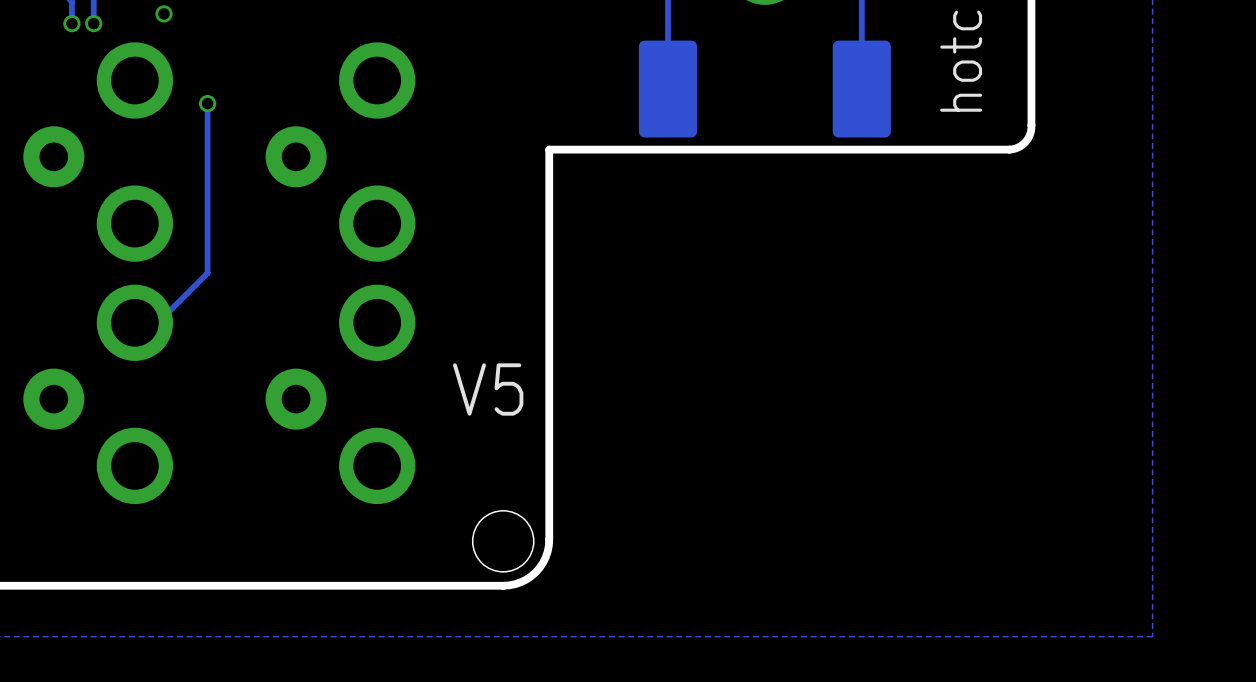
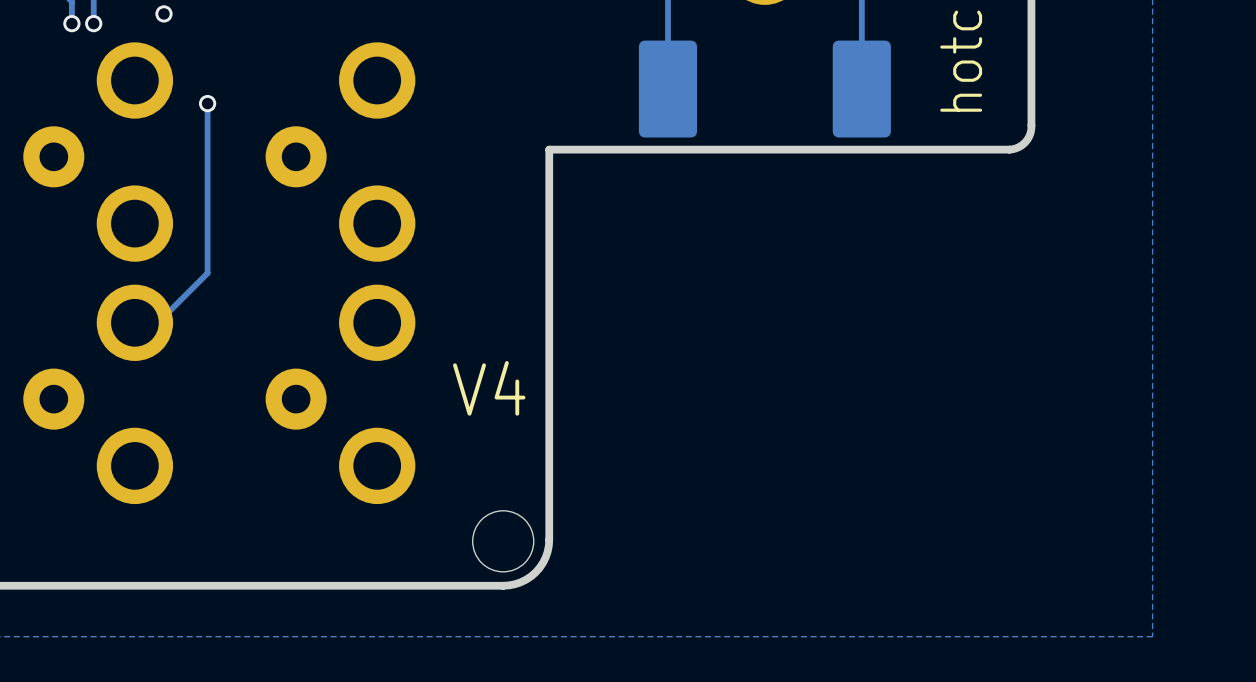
text: V5 (488, 389) -> V4 (489, 388)

